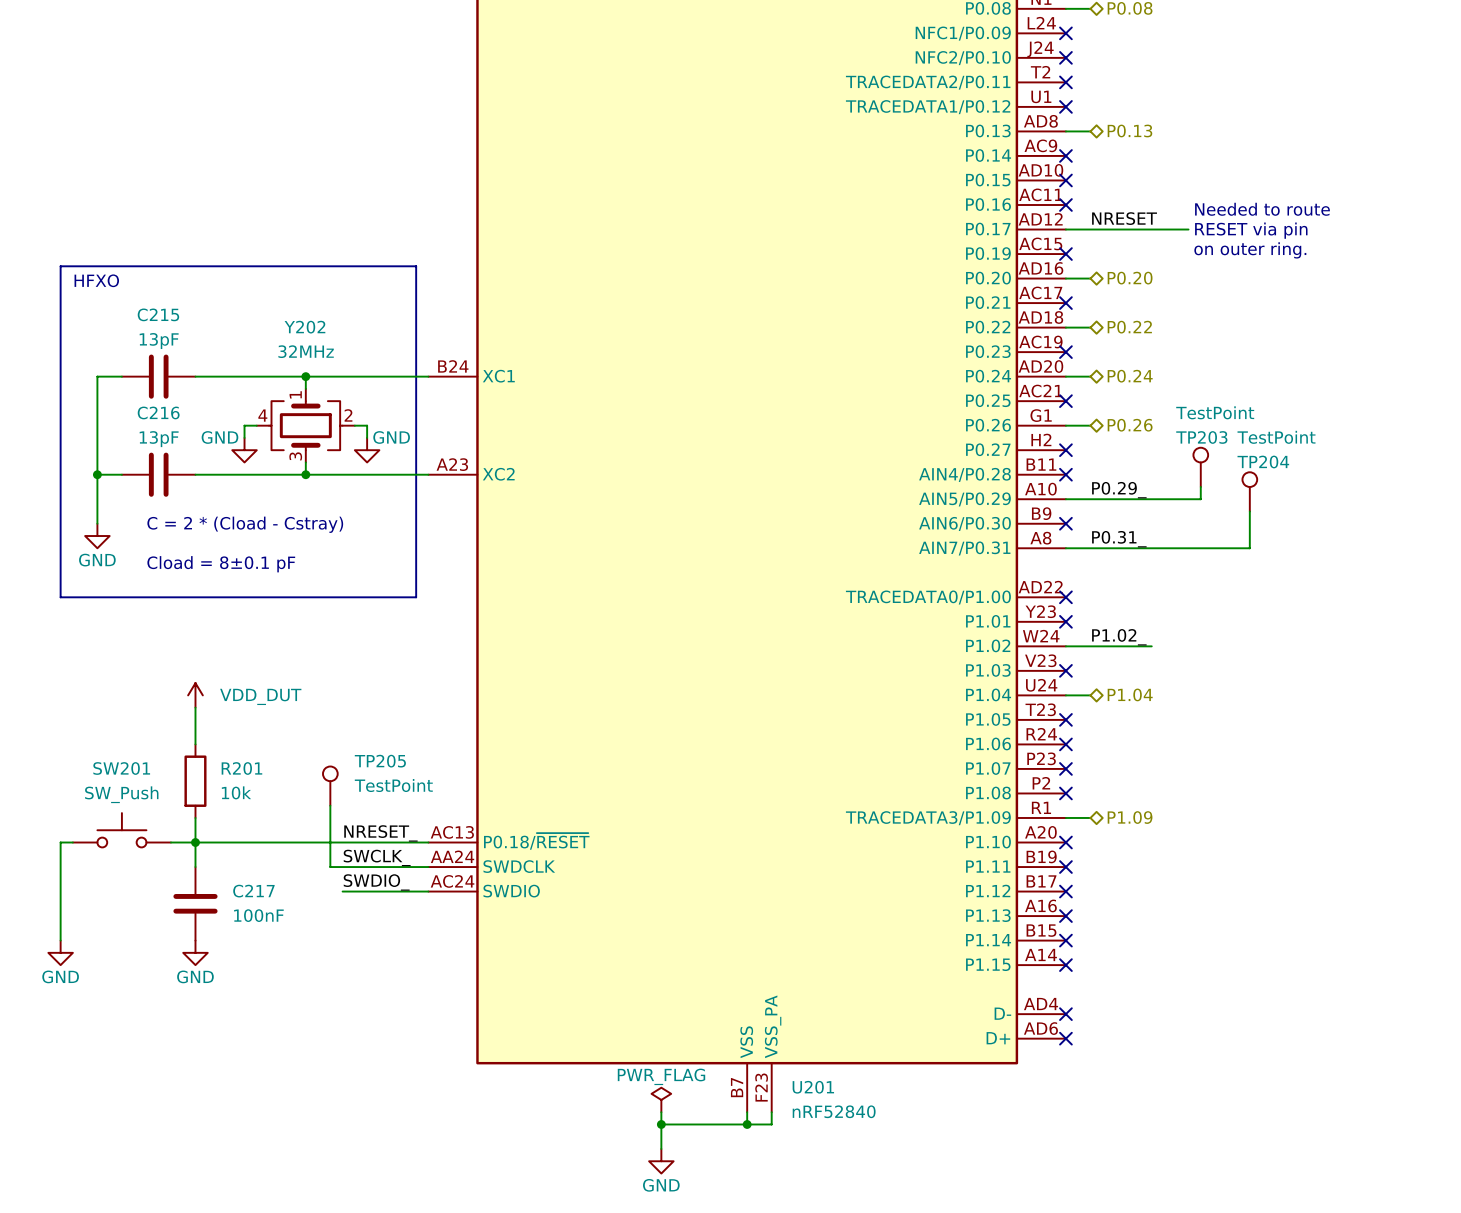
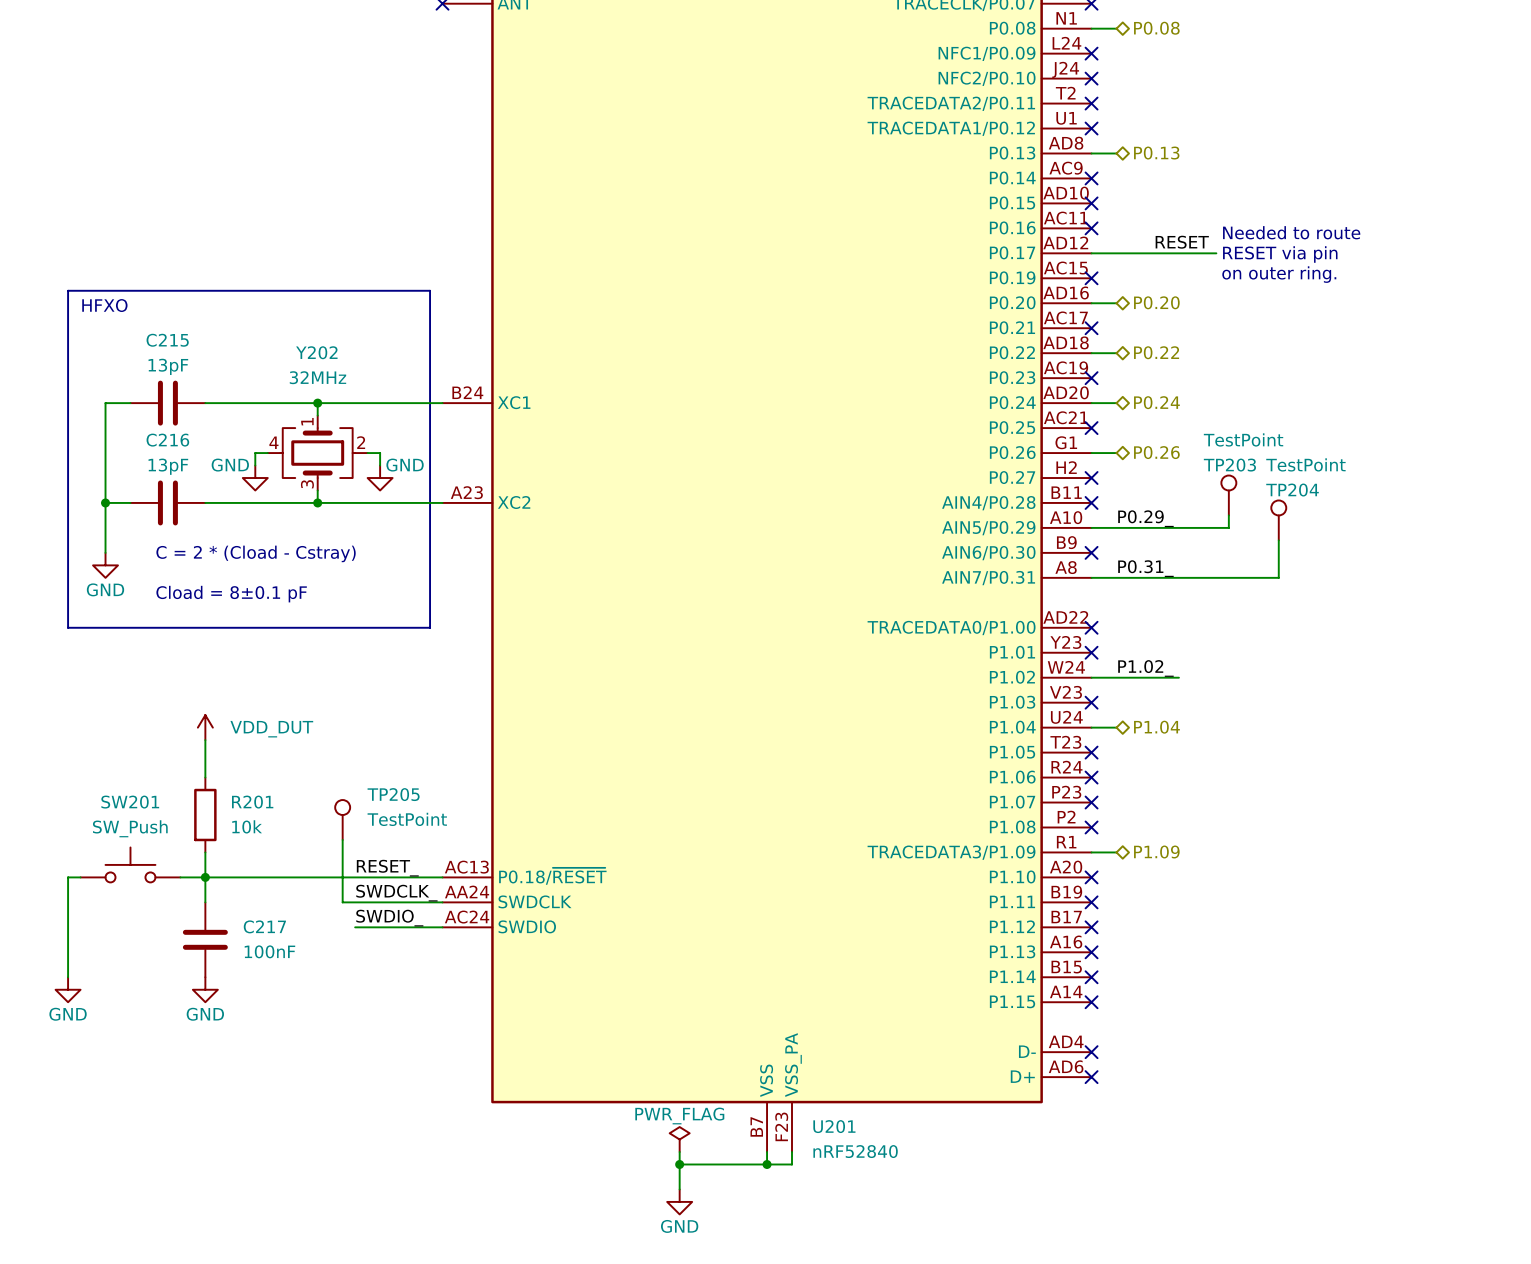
label: NRESET (1124, 218) -> RESET (1182, 242)
label: NRESET_ (380, 833) -> RESET_ (387, 868)
label: SWCLK_ (377, 857) -> SWDCLK_ (396, 893)

